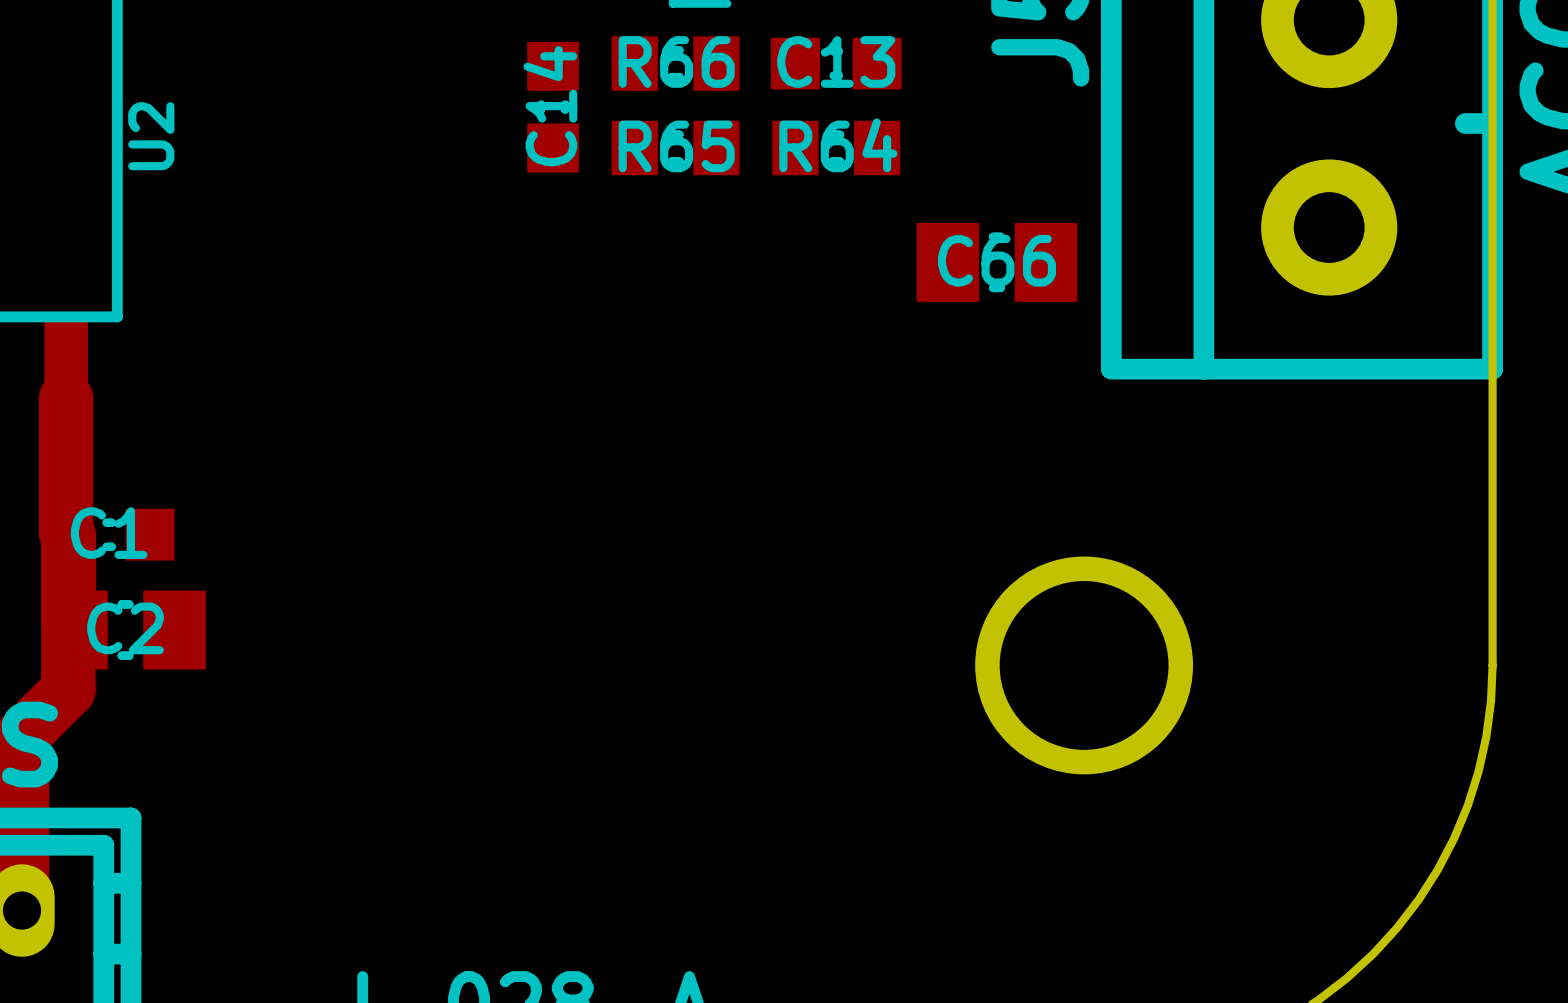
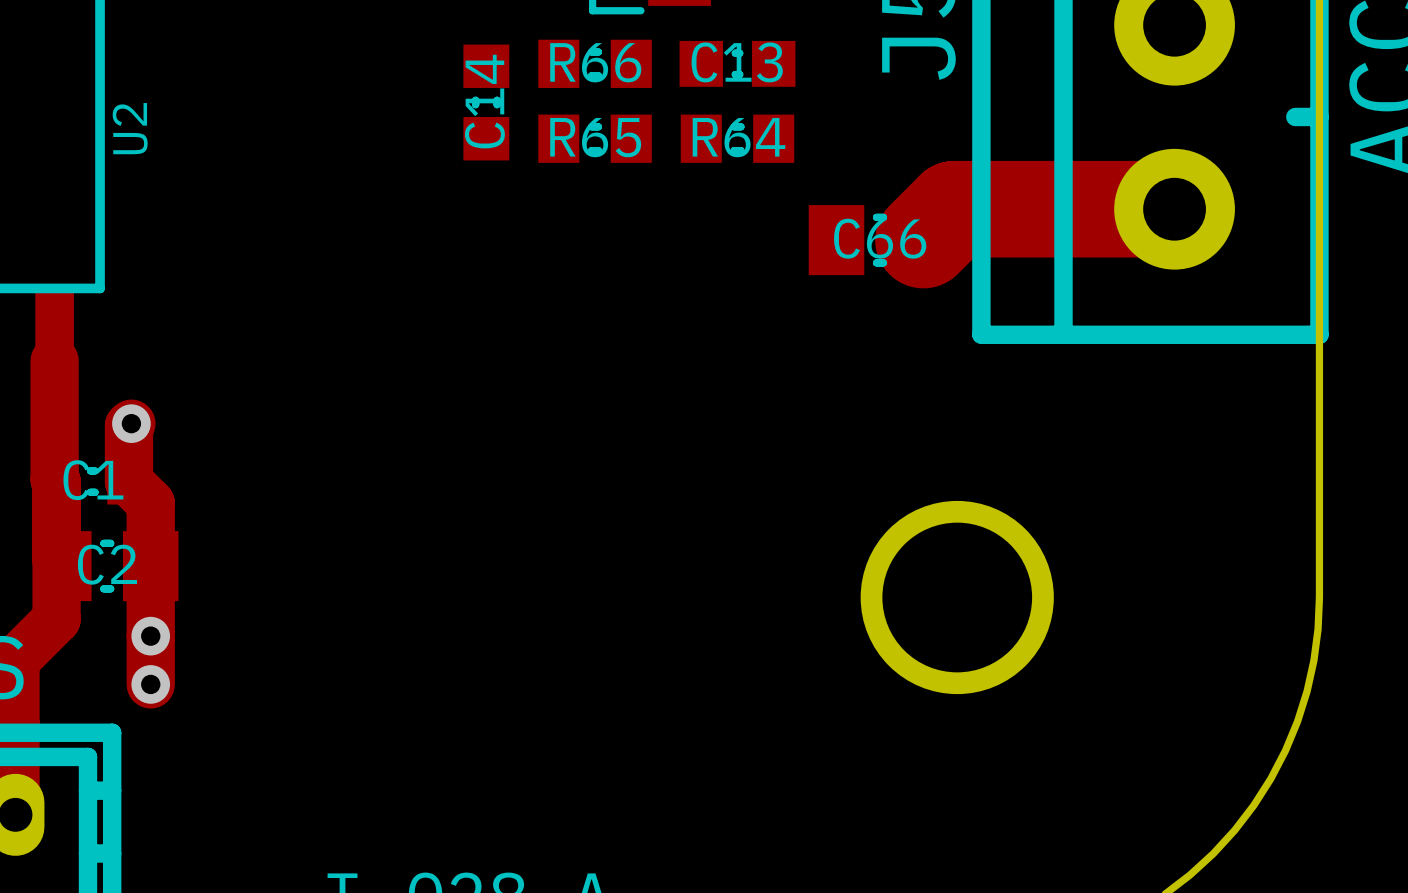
track: none -> (1174, 209) (954, 209) (923, 240)
track: none -> (131, 423) (129, 426) (129, 481) (150, 503) (150, 684)
via: none -> (131, 423)
via: none -> (150, 636)
via: none -> (150, 684)

